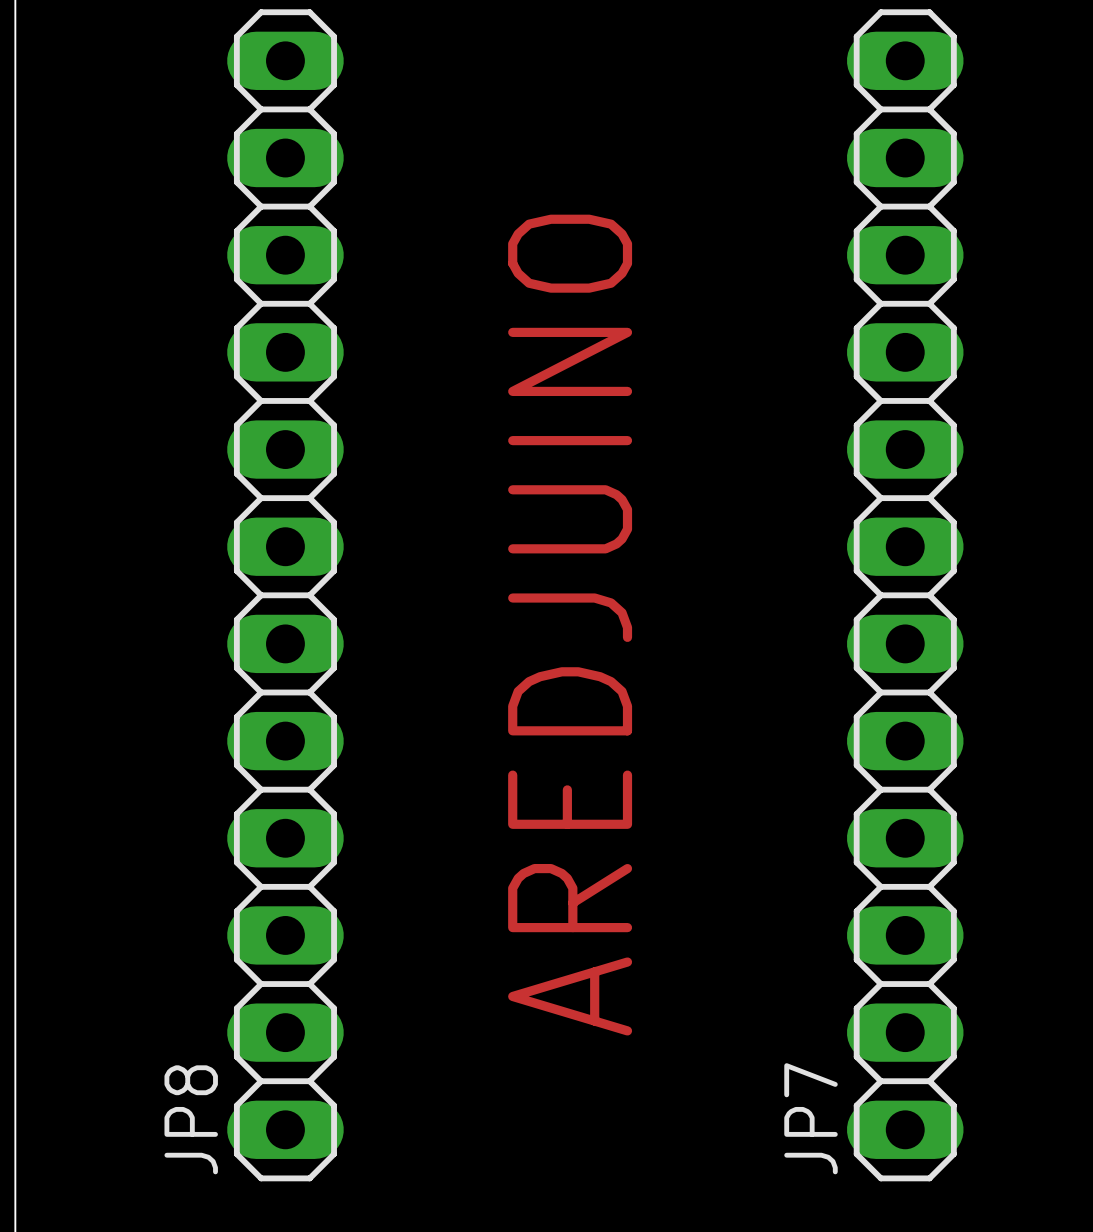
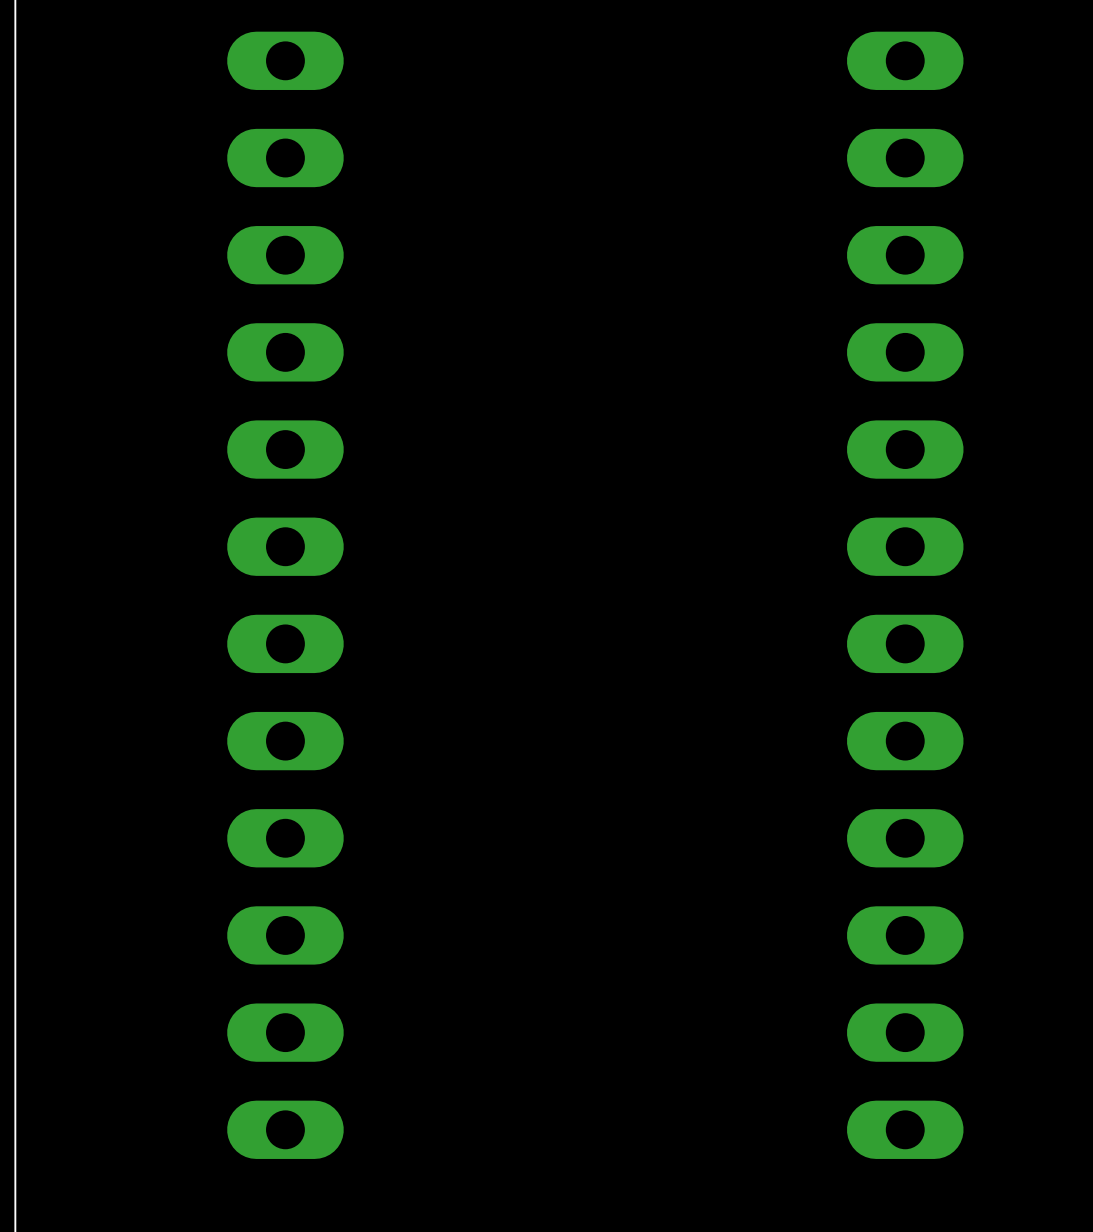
JP8 side: top (285, 595) -> bottom (285, 595)
JP7 side: top (905, 595) -> bottom (905, 595)
text: AREDJUINO (570, 625) -> none

